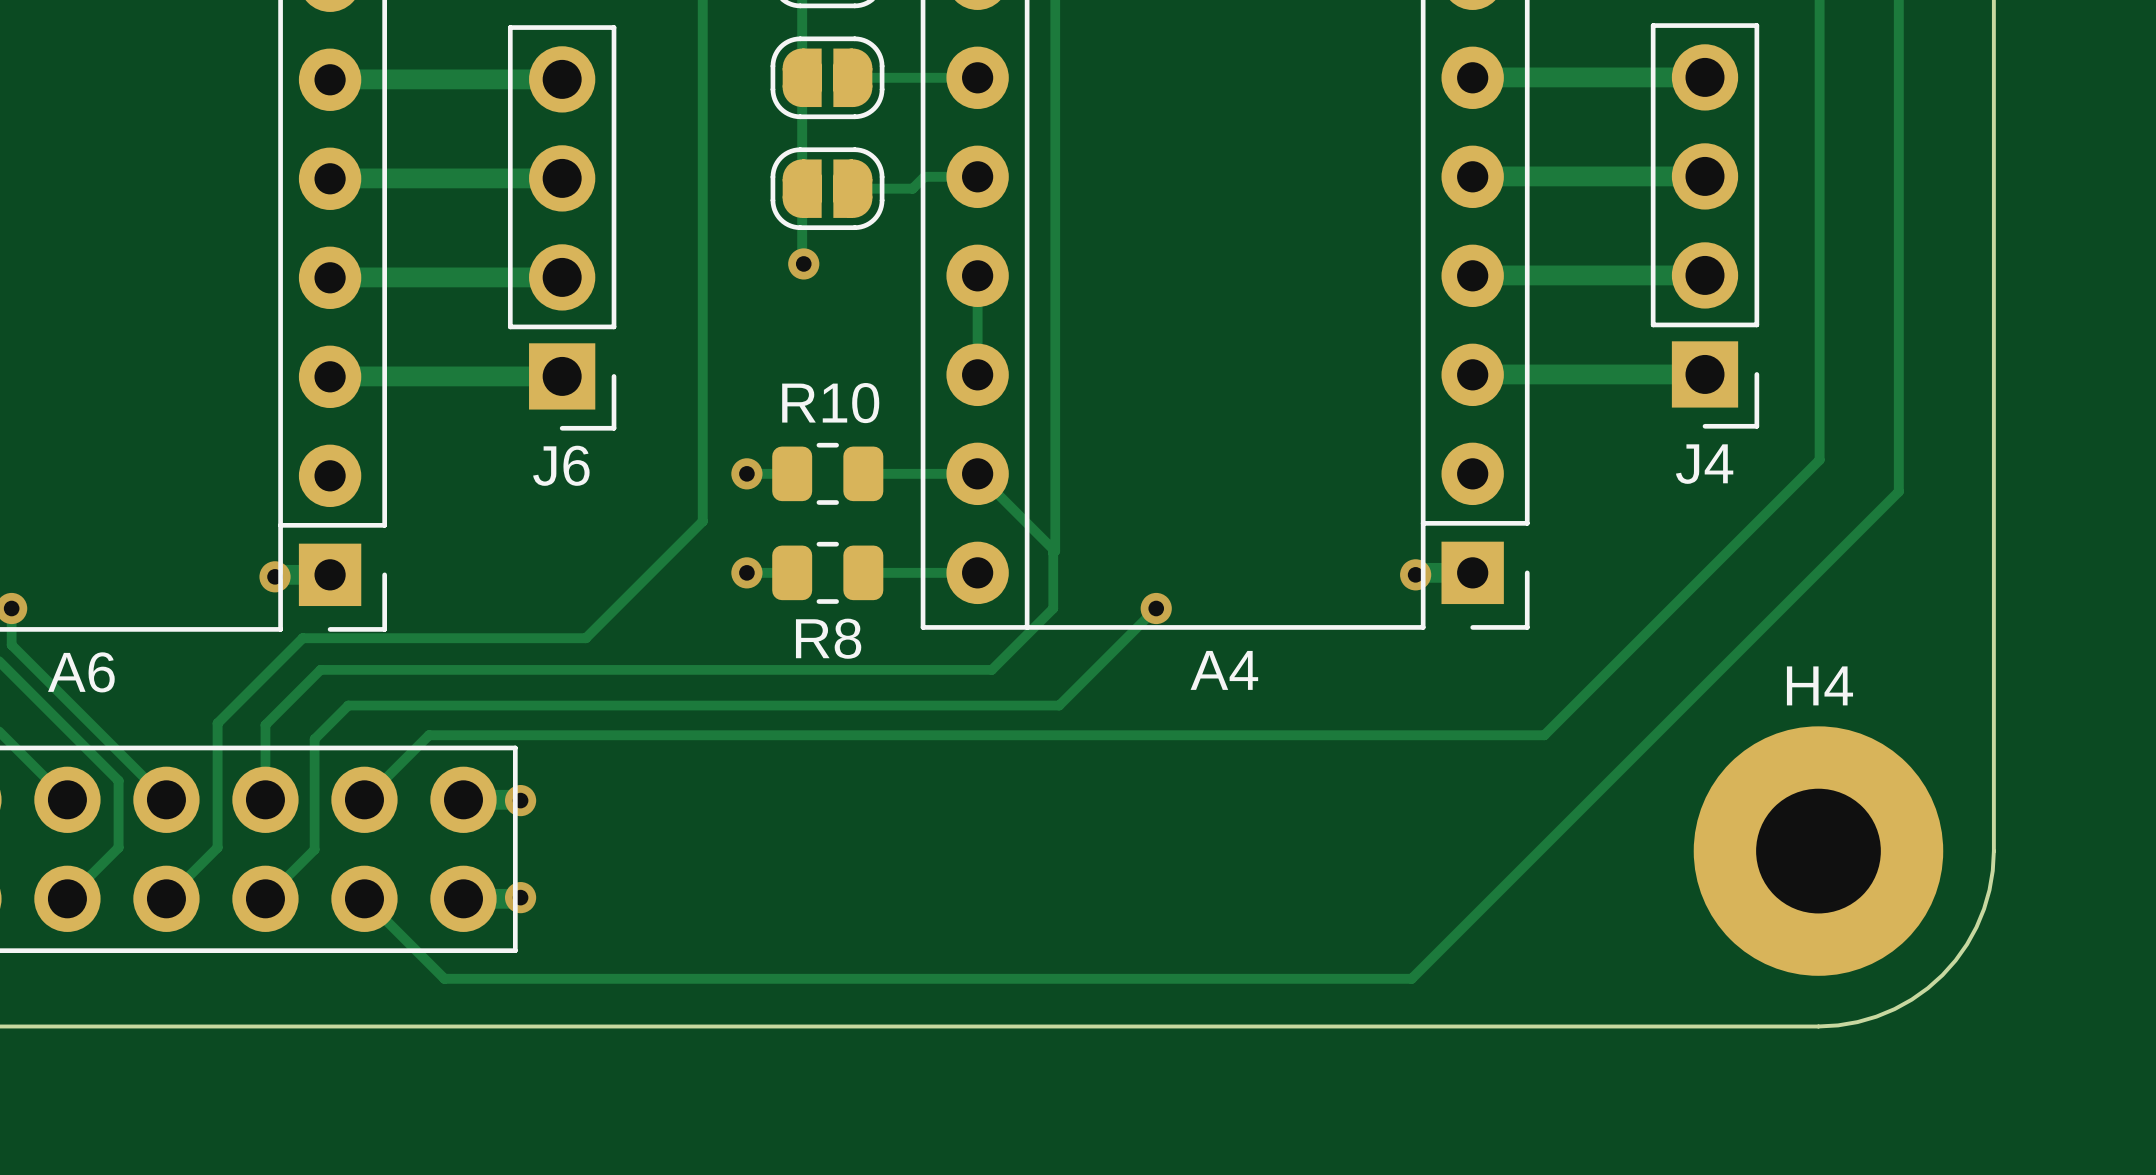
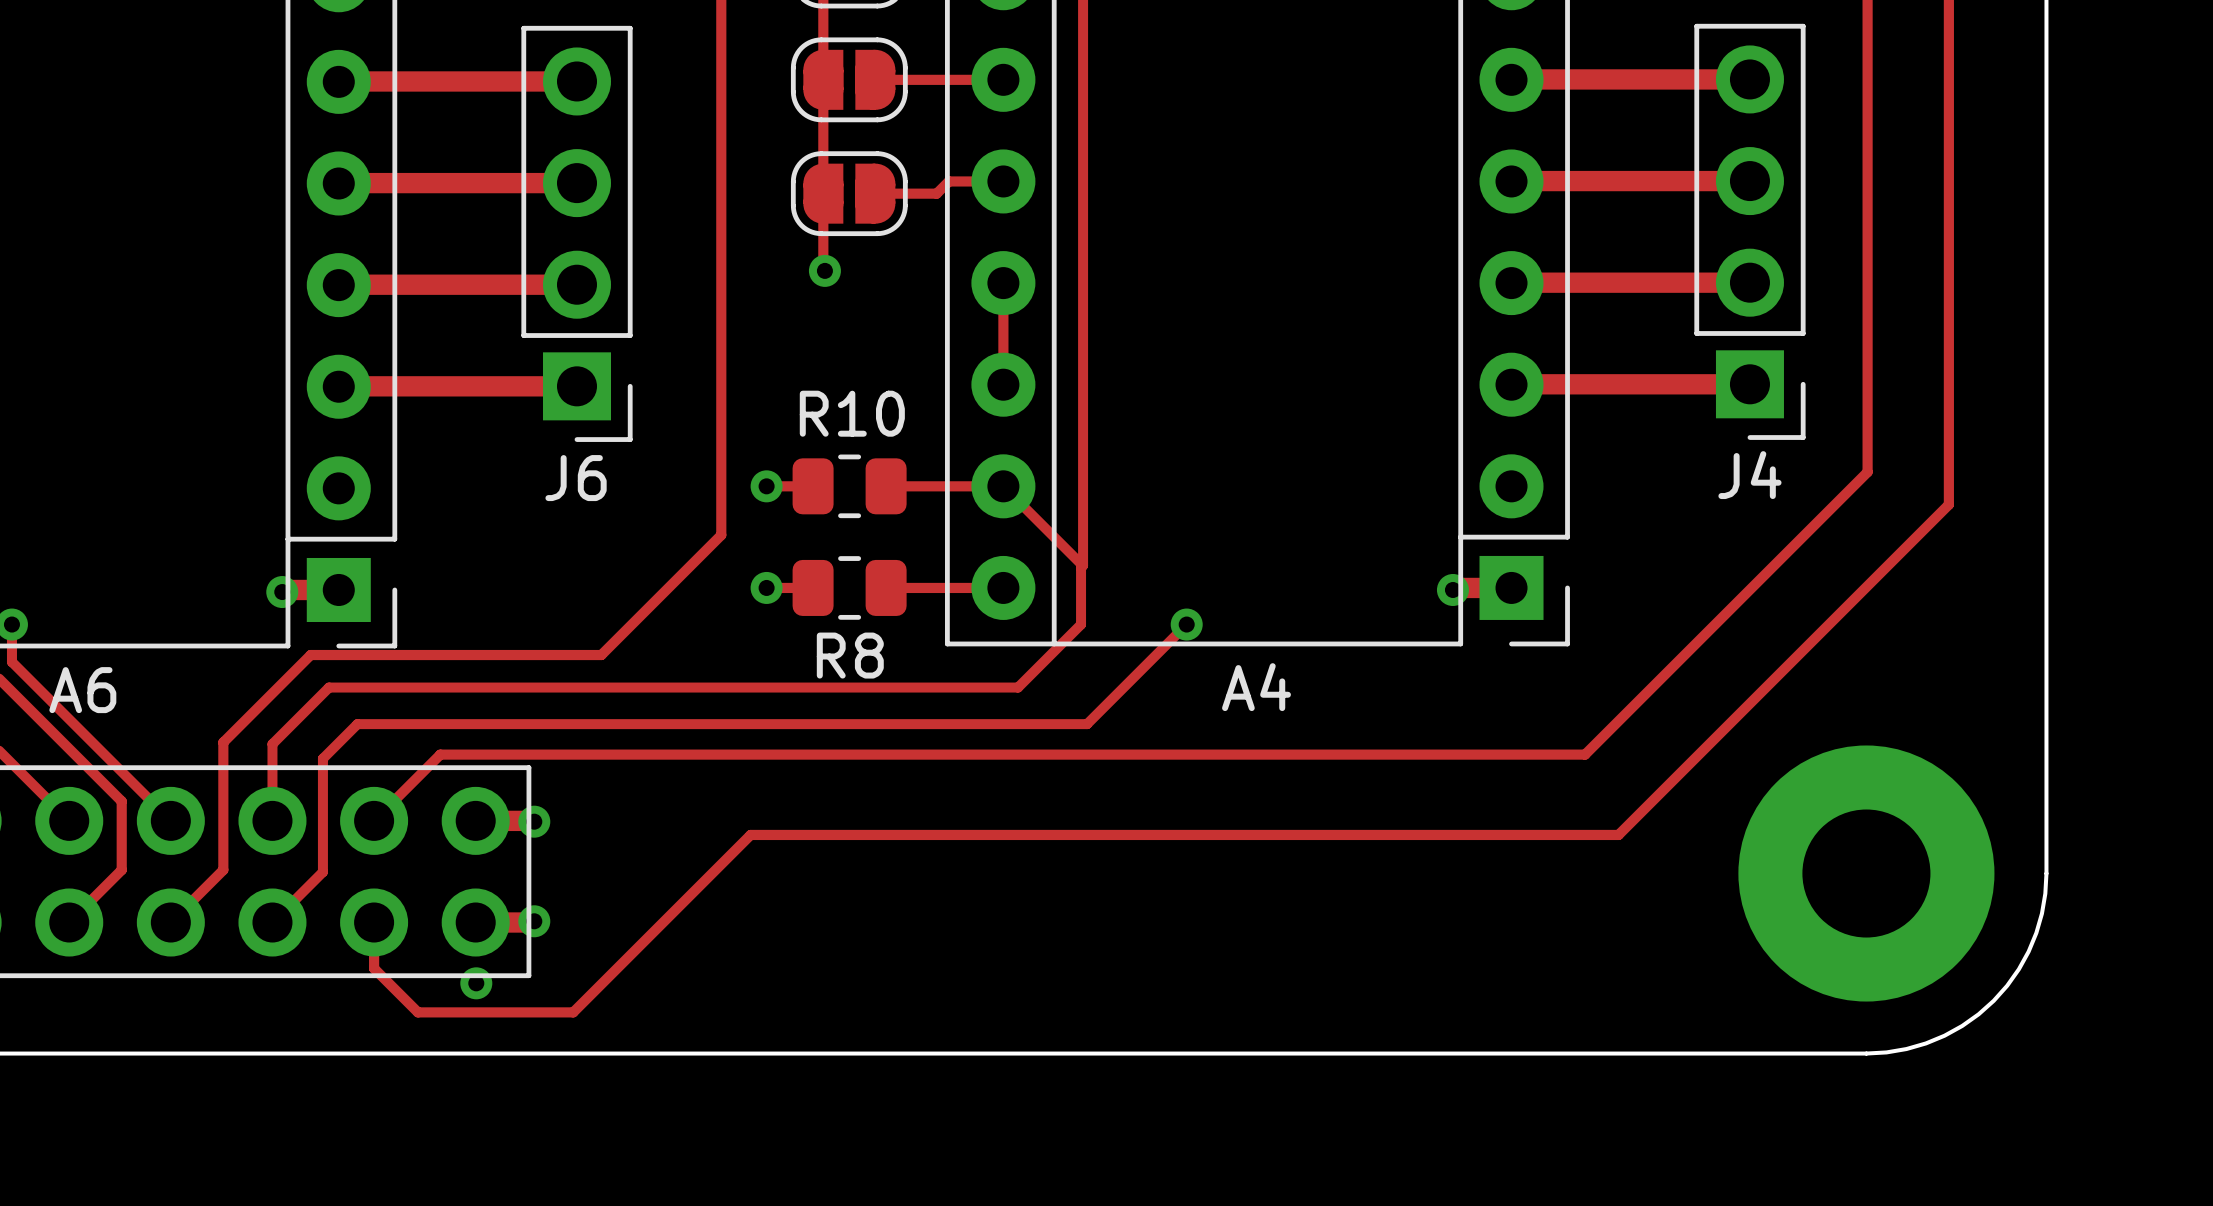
H4 name: H4 (1819, 685) -> none
track: (1576, 813) (1411, 978) (444, 978) (364, 898) -> (1618, 834) (750, 834) (573, 1012) (417, 1012) (374, 968) (374, 922)
via: none -> (476, 983)

